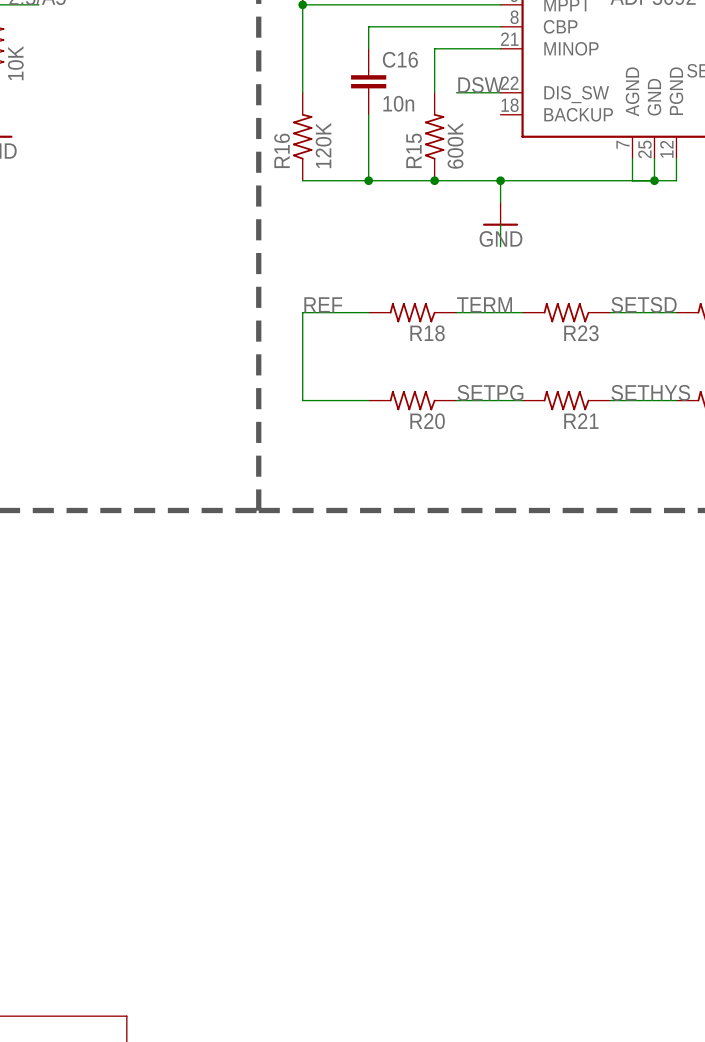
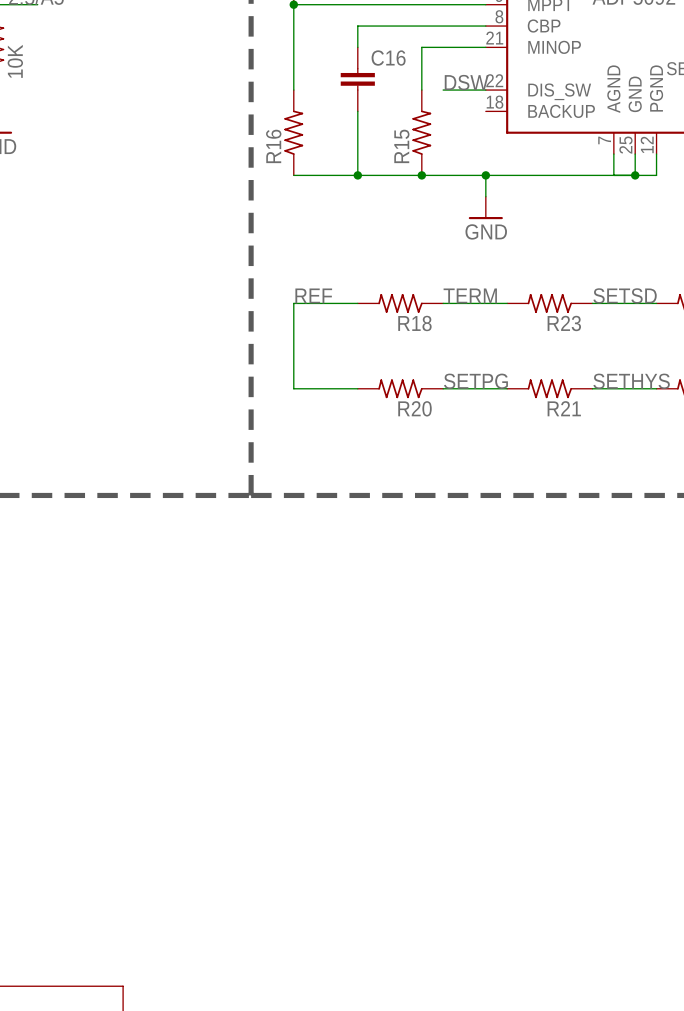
C16 value: 10n (398, 103) -> none
R16 value: 120K (323, 145) -> none
R15 value: 600K (455, 145) -> none
wire: (500, 224) (500, 246) -> none

